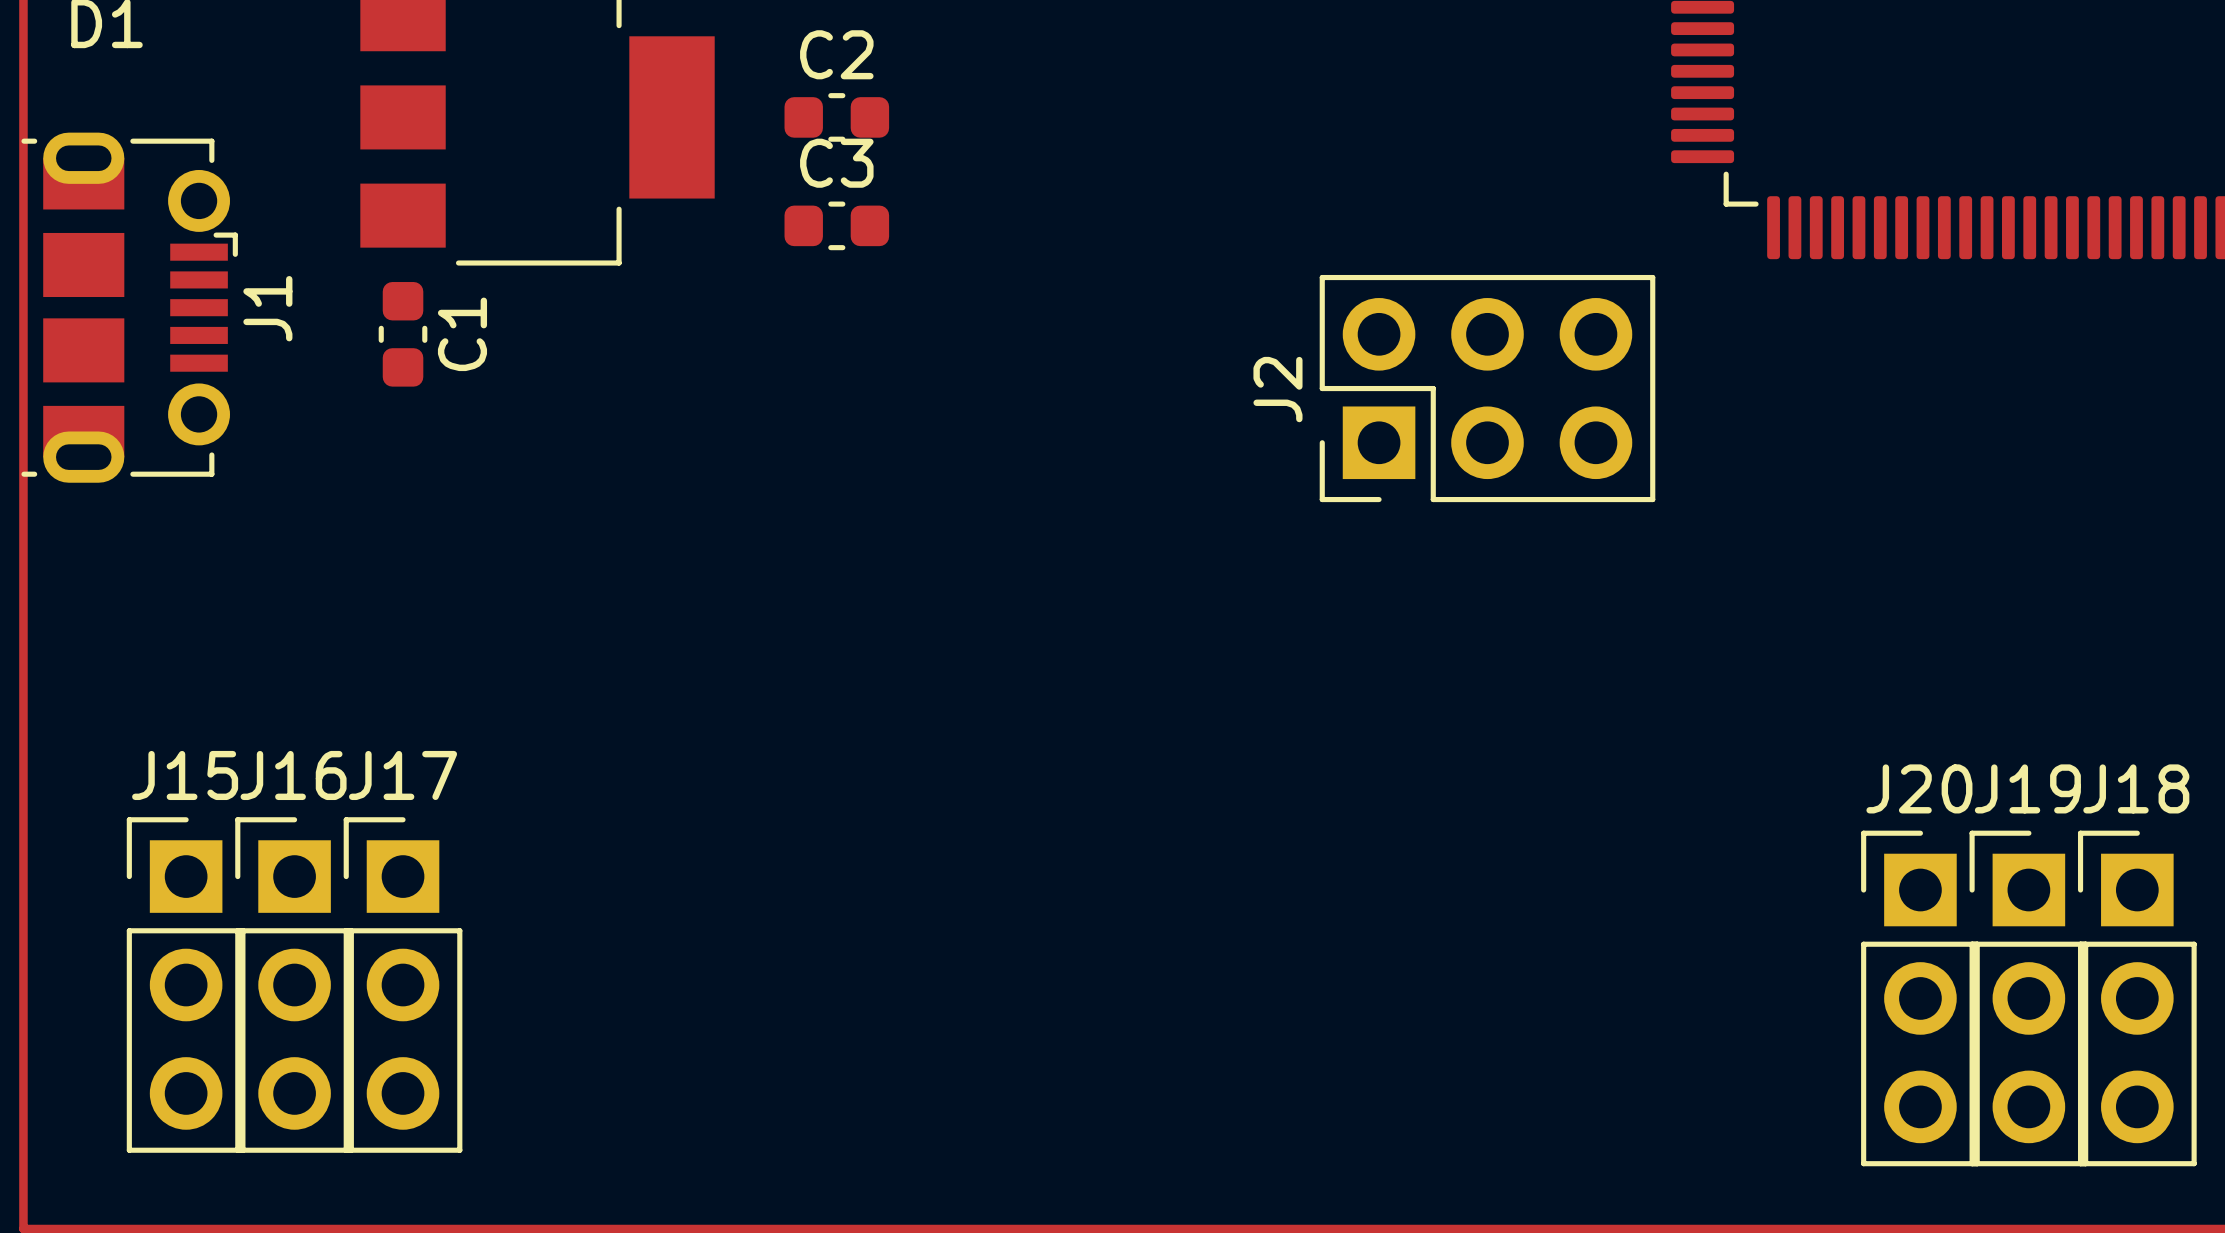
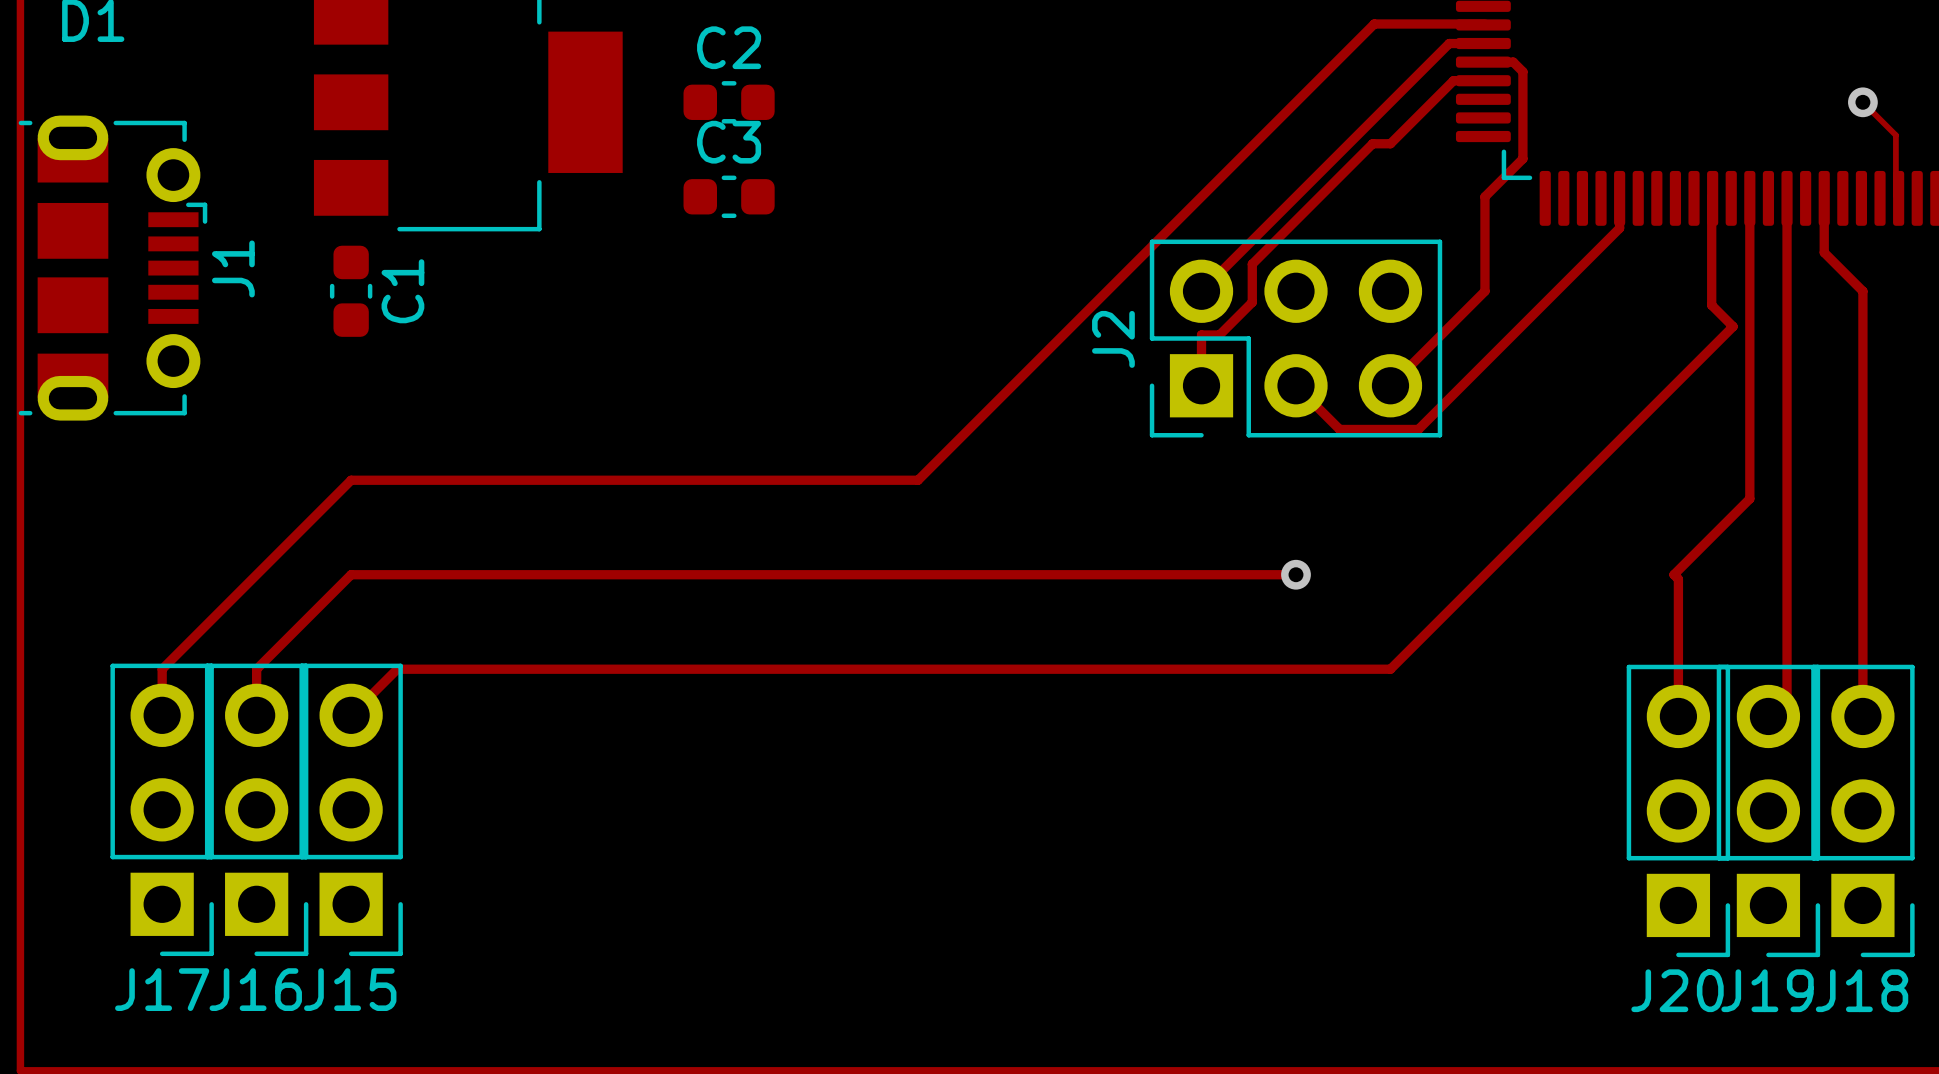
track: none -> (1484, 24) (1374, 24) (918, 480) (351, 480) (162, 669) (162, 715)
track: none -> (1483, 43) (1449, 43) (1201, 291)
track: none -> (1483, 62) (1513, 62) (1522, 71) (1522, 158) (1484, 196) (1484, 291) (1390, 385)
track: none -> (1483, 80) (1453, 80) (1390, 143) (1372, 143) (1252, 264) (1252, 302) (1219, 334) (1201, 334) (1201, 385)
track: none -> (1862, 102) (1895, 135) (1895, 195) (1898, 198)
via: none -> (1862, 102)
track: none -> (1712, 197) (1711, 305) (1733, 326) (1390, 669) (397, 669) (351, 715)
track: none -> (1619, 198) (1619, 228) (1418, 429) (1339, 429) (1296, 385)
track: none -> (1749, 198) (1749, 498) (1673, 574) (1678, 579) (1678, 716)
track: none -> (1787, 198) (1787, 697) (1768, 716)
track: none -> (1824, 198) (1824, 252) (1862, 291) (1862, 716)
track: none -> (1296, 574) (351, 574) (256, 669) (256, 715)
via: none -> (1296, 574)
J15 rotation: 0° (186, 985) -> 180° (351, 809)
J15 position: (186, 985) -> (351, 809)
J16 rotation: 0° (294, 985) -> 180° (256, 809)
J17 rotation: 0° (403, 985) -> 180° (162, 809)
J17 position: (403, 985) -> (162, 809)
J20 rotation: 0° (1920, 998) -> 180° (1678, 810)
J19 rotation: 0° (2028, 998) -> 180° (1768, 810)
J18 rotation: 0° (2137, 998) -> 180° (1862, 810)

